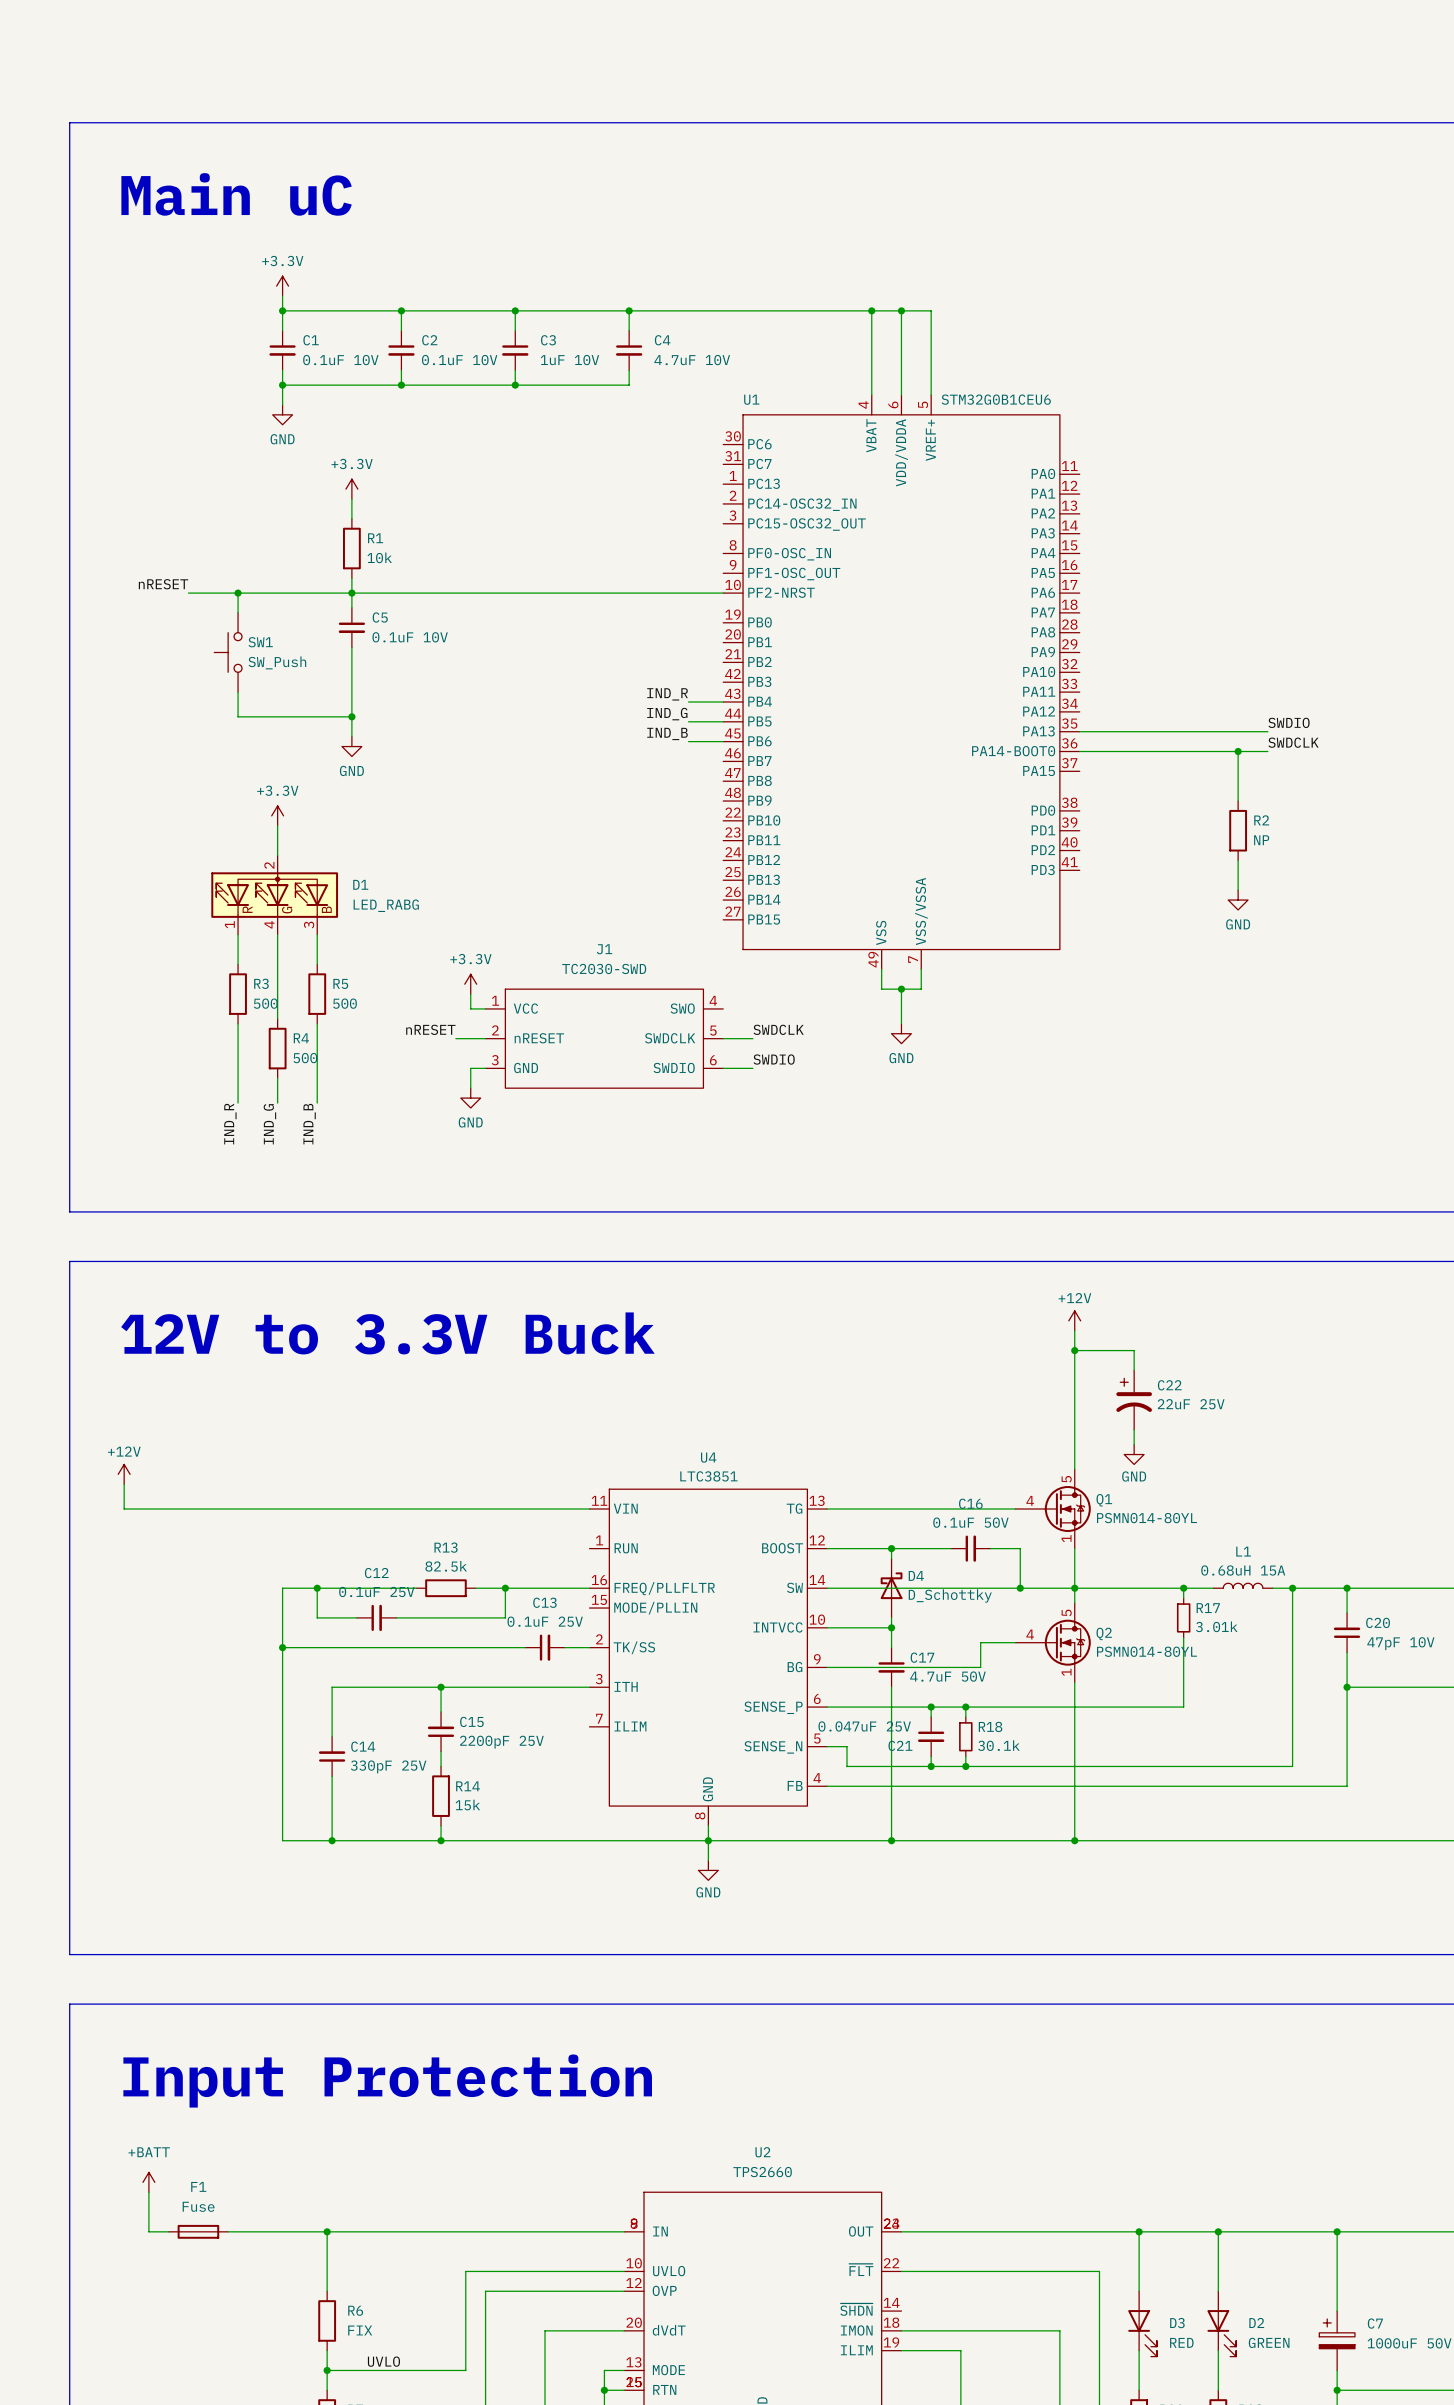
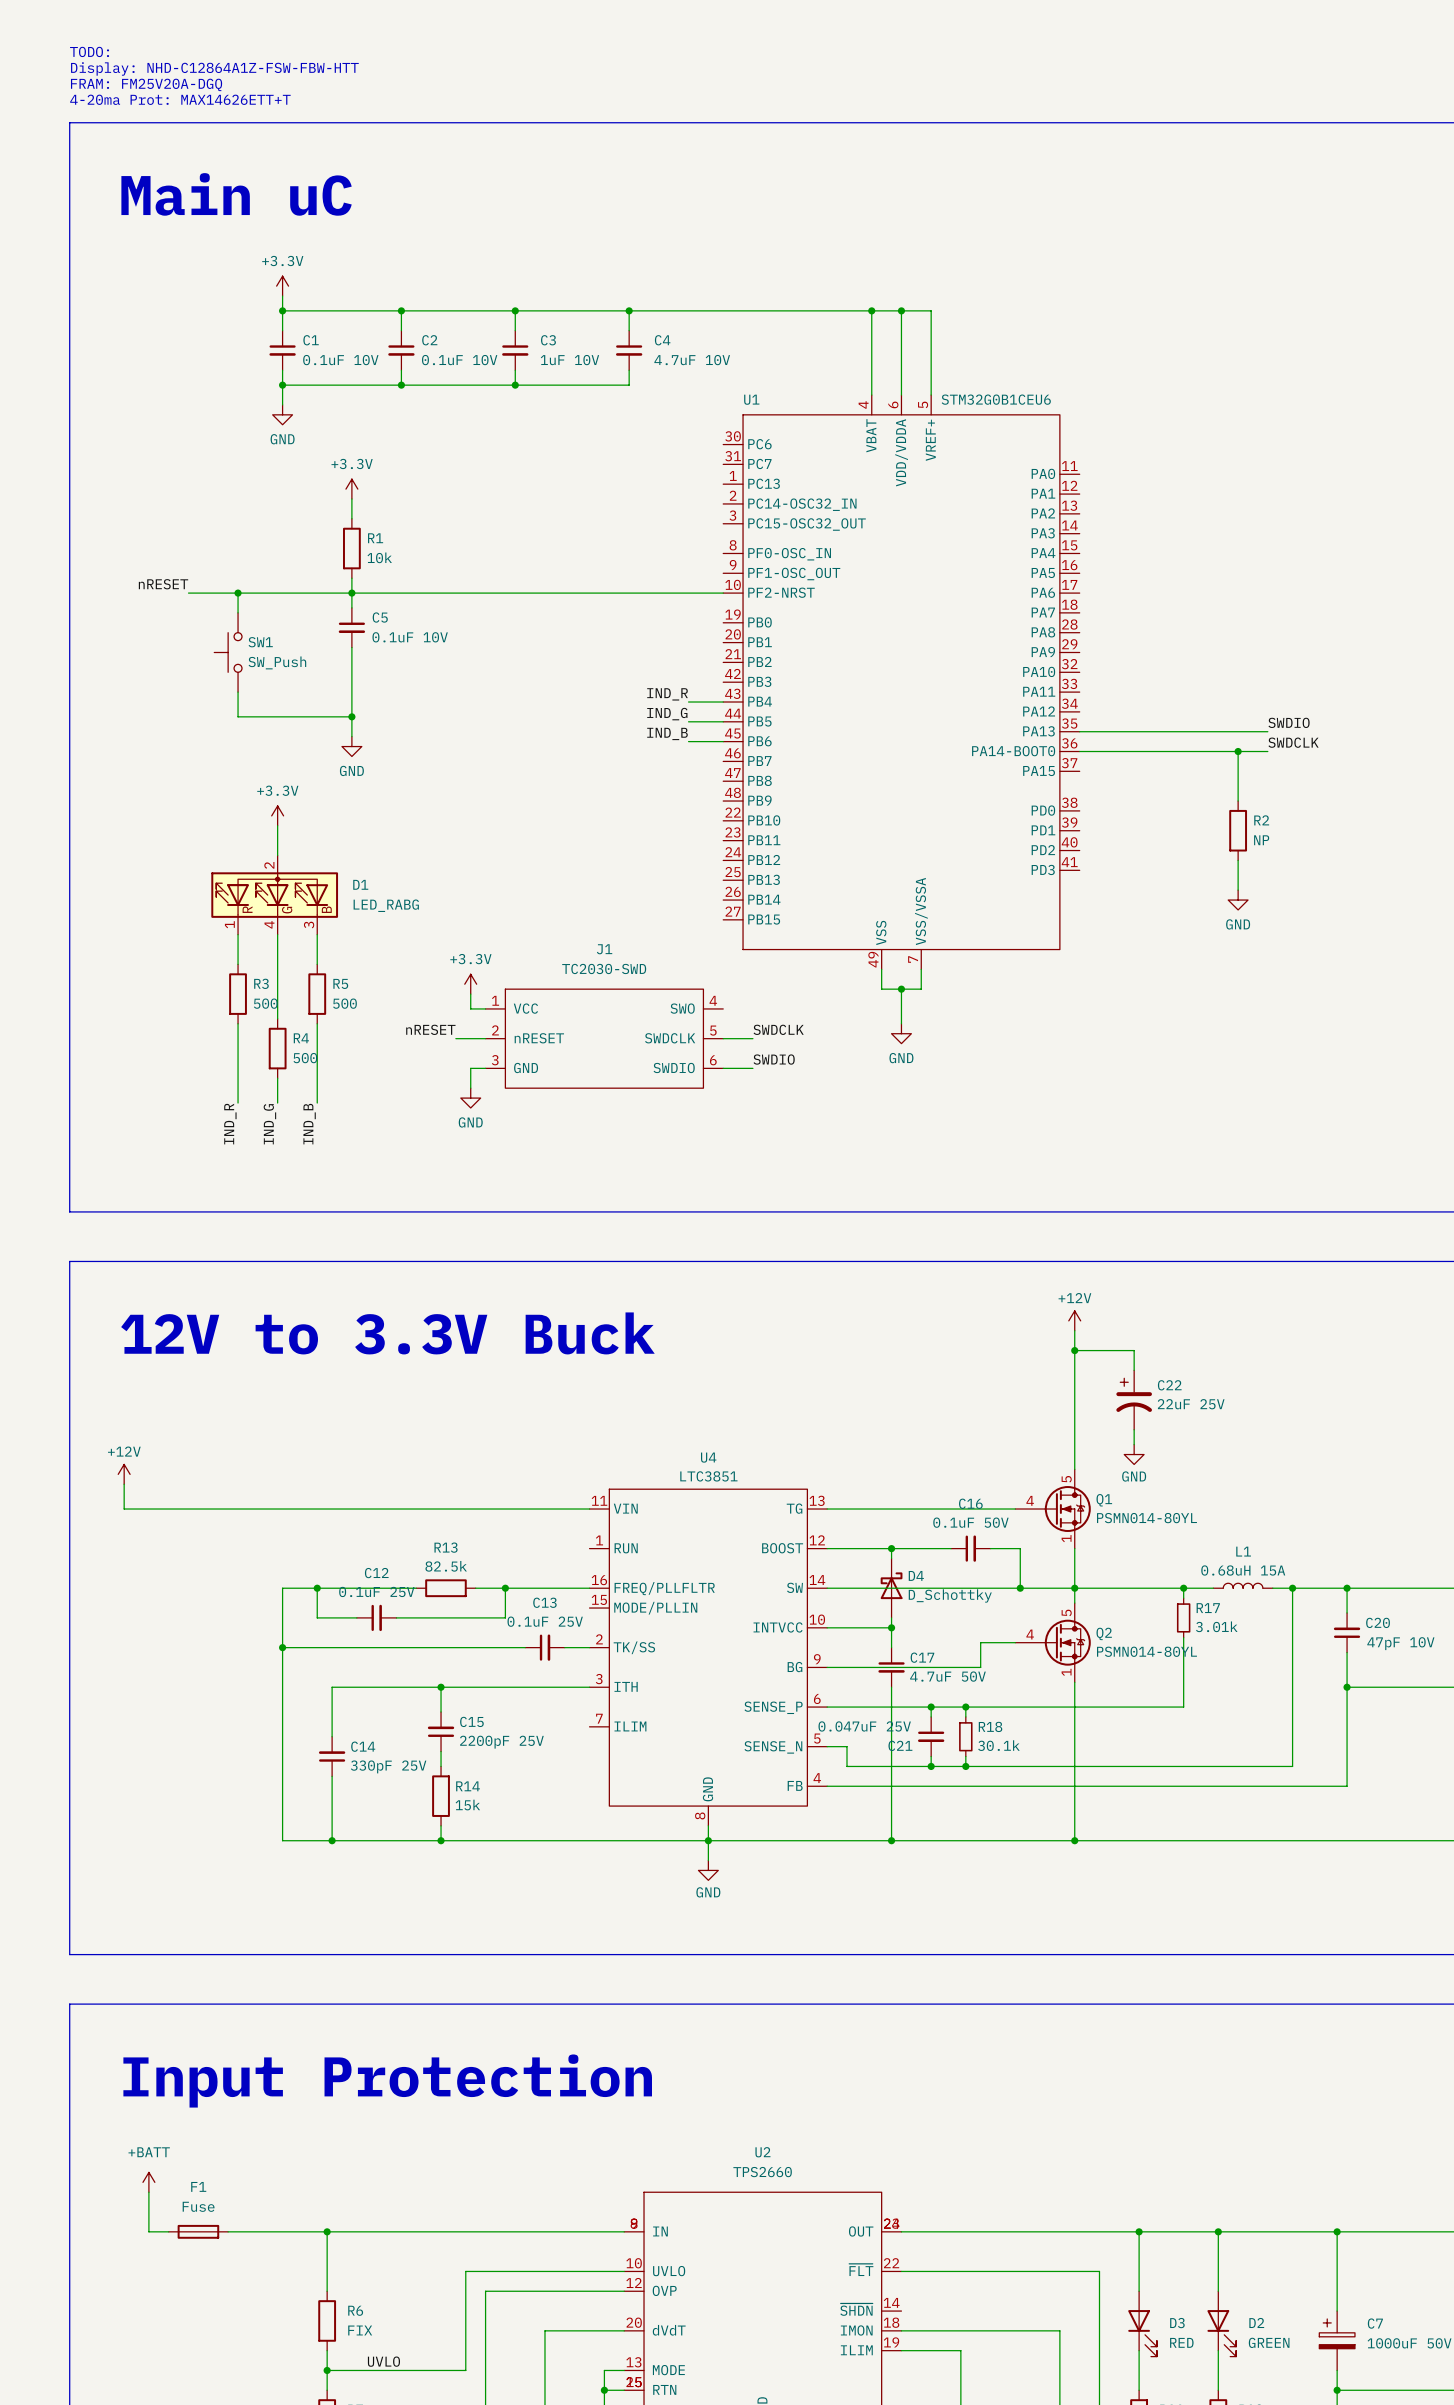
text: none -> TODO: (89, 51)
text: none -> Display: NHD-C12864A1Z-FSW-FBW-HTT (214, 68)
text: none -> FRAM: FM25V20A-DGQ (146, 84)
text: none -> 4-20ma Prot: MAX14626ETT+T (180, 99)

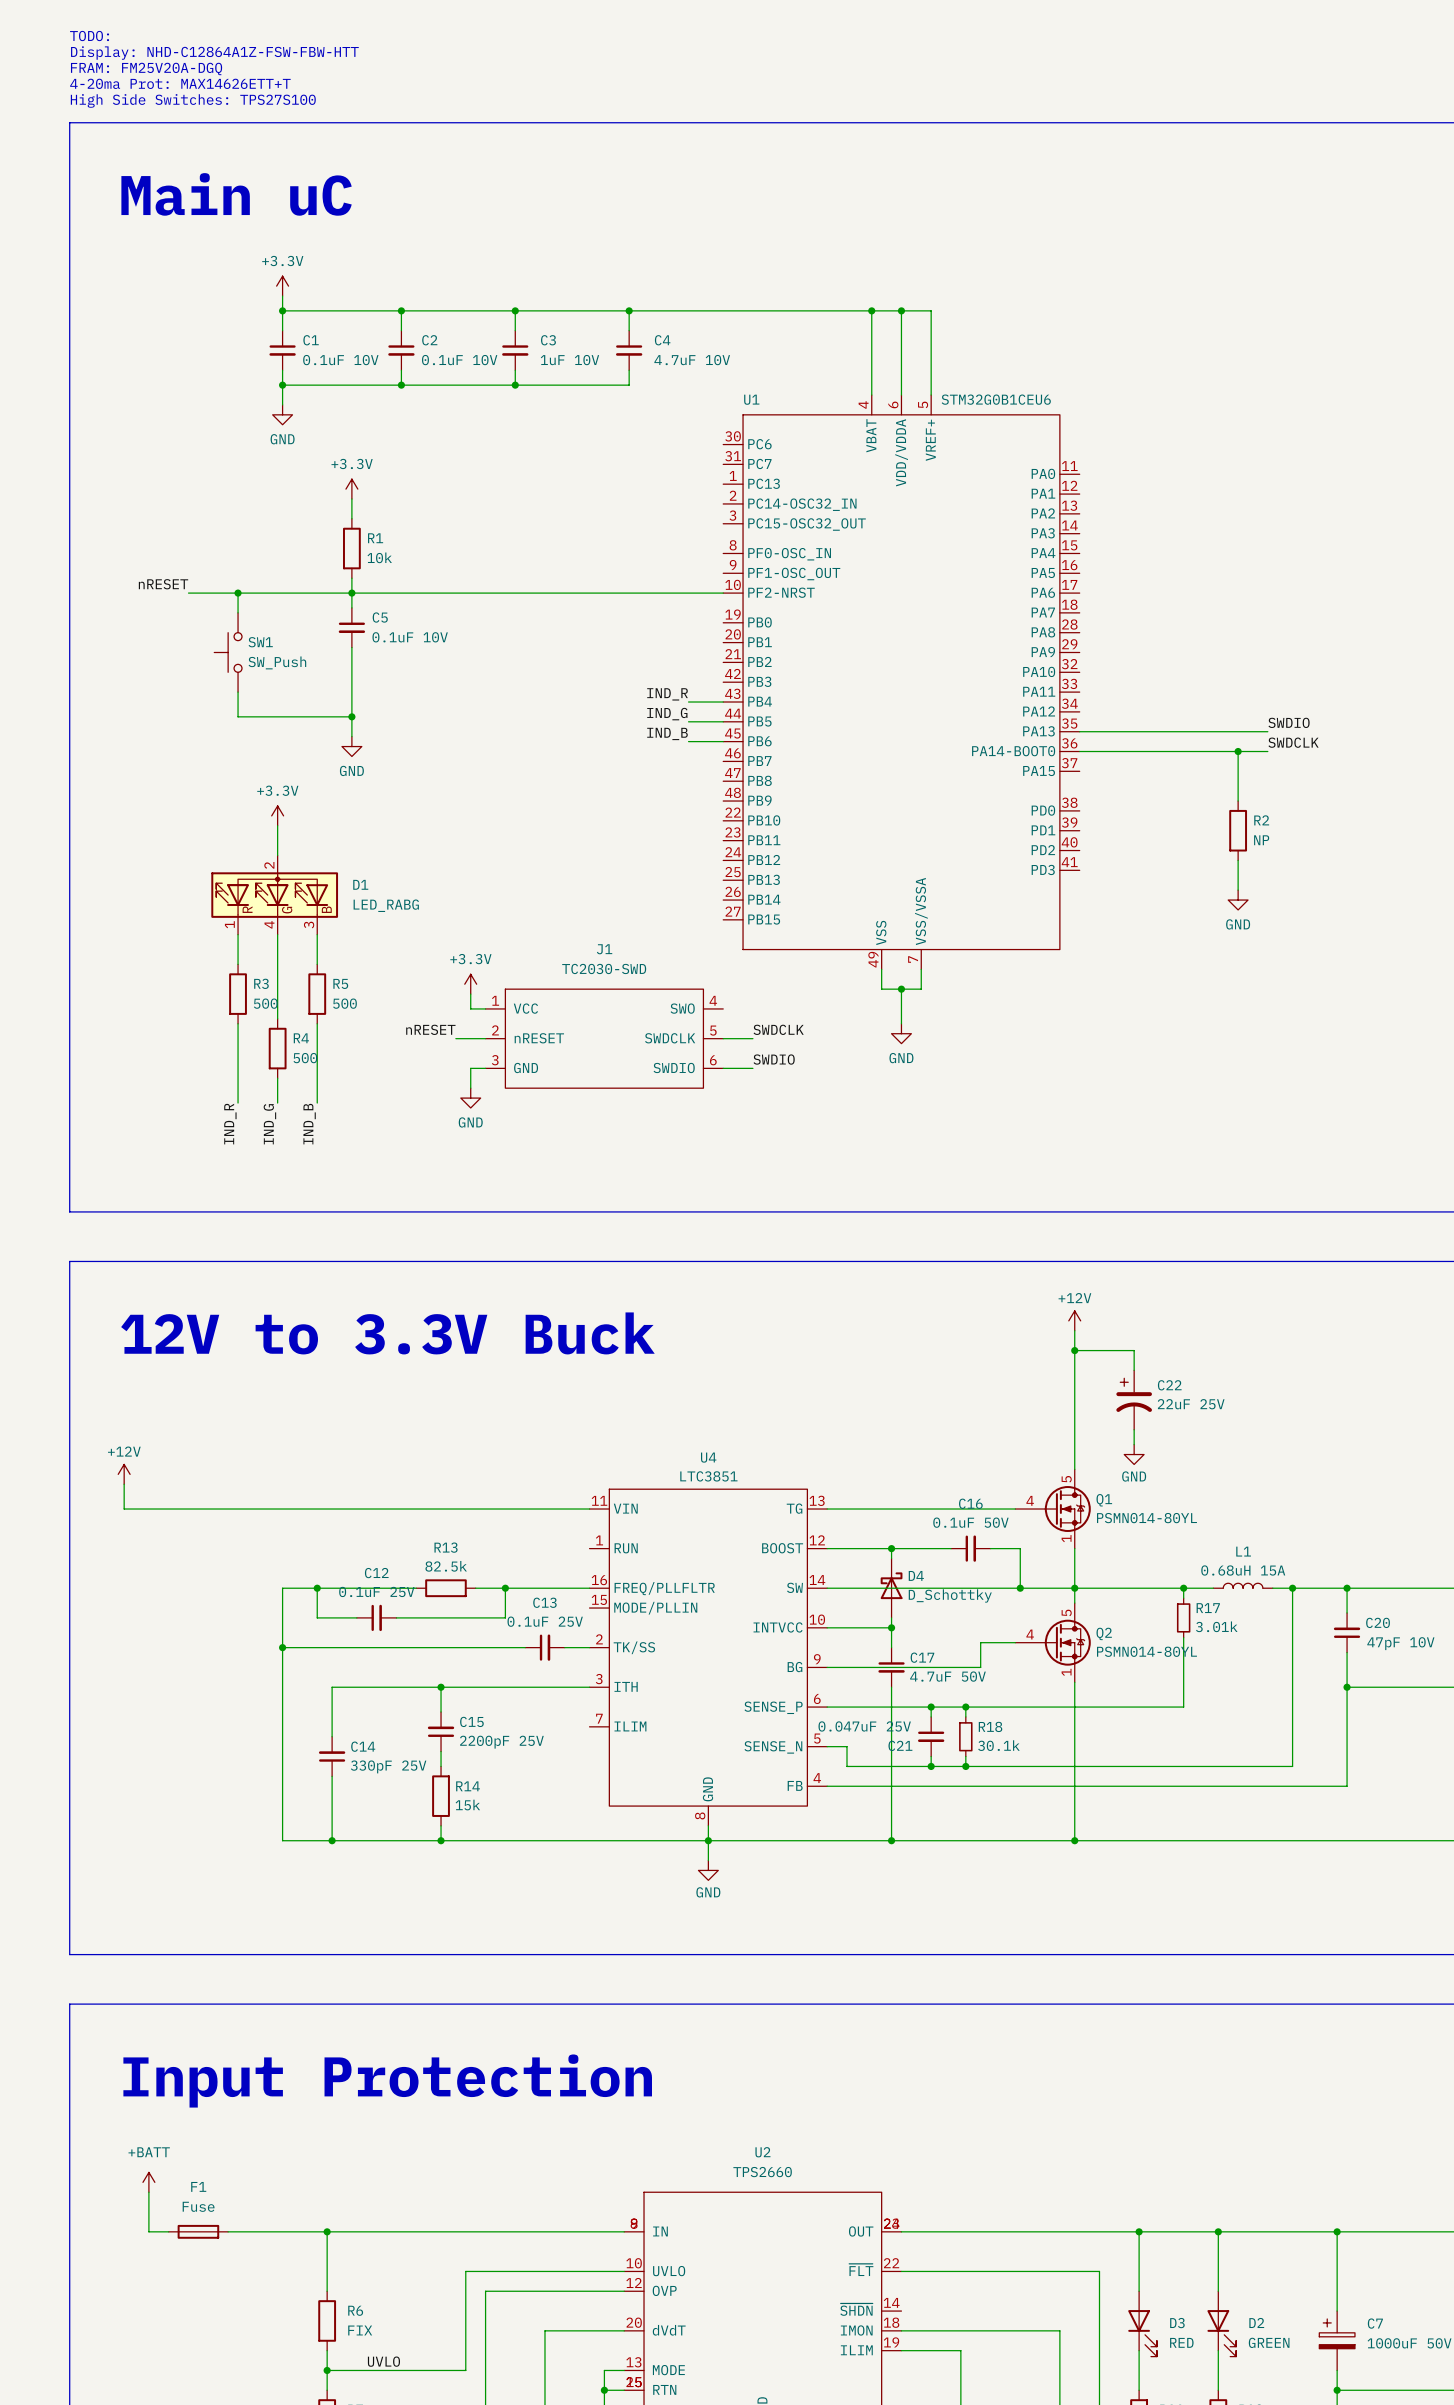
text: none -> TODO: (89, 36)
text: TODO: (89, 51) -> Display: NHD-C12864A1Z-FSW-FBW-HTT (214, 53)
text: Display: NHD-C12864A1Z-FSW-FBW-HTT (214, 68) -> FRAM: FM25V20A-DGQ (146, 68)
text: FRAM: FM25V20A-DGQ (146, 84) -> 4-20ma Prot: MAX14626ETT+T (180, 83)
text: 4-20ma Prot: MAX14626ETT+T (180, 99) -> High Side Switches: TPS27S100 (193, 100)

